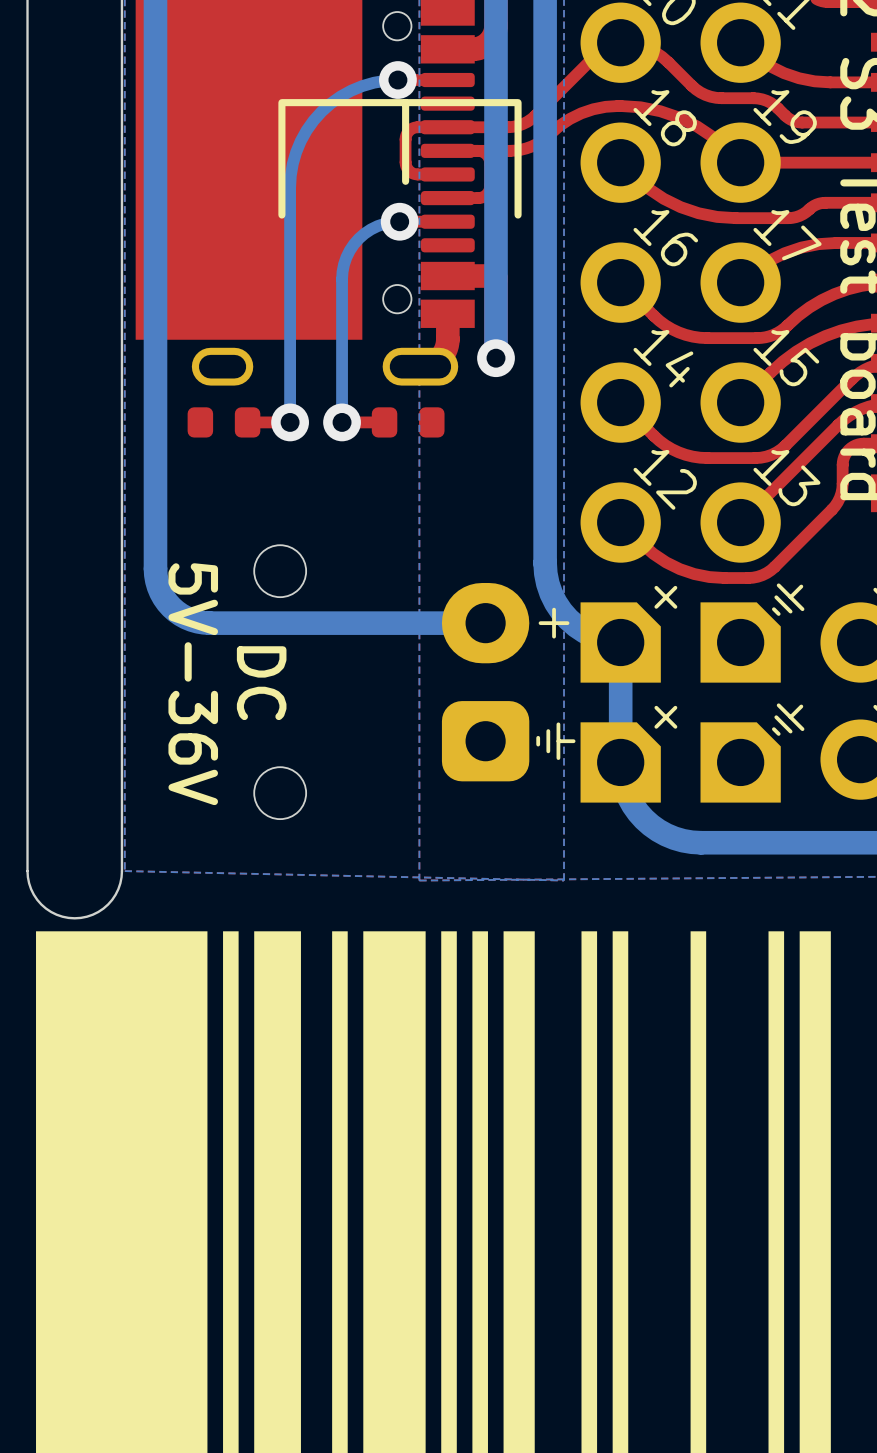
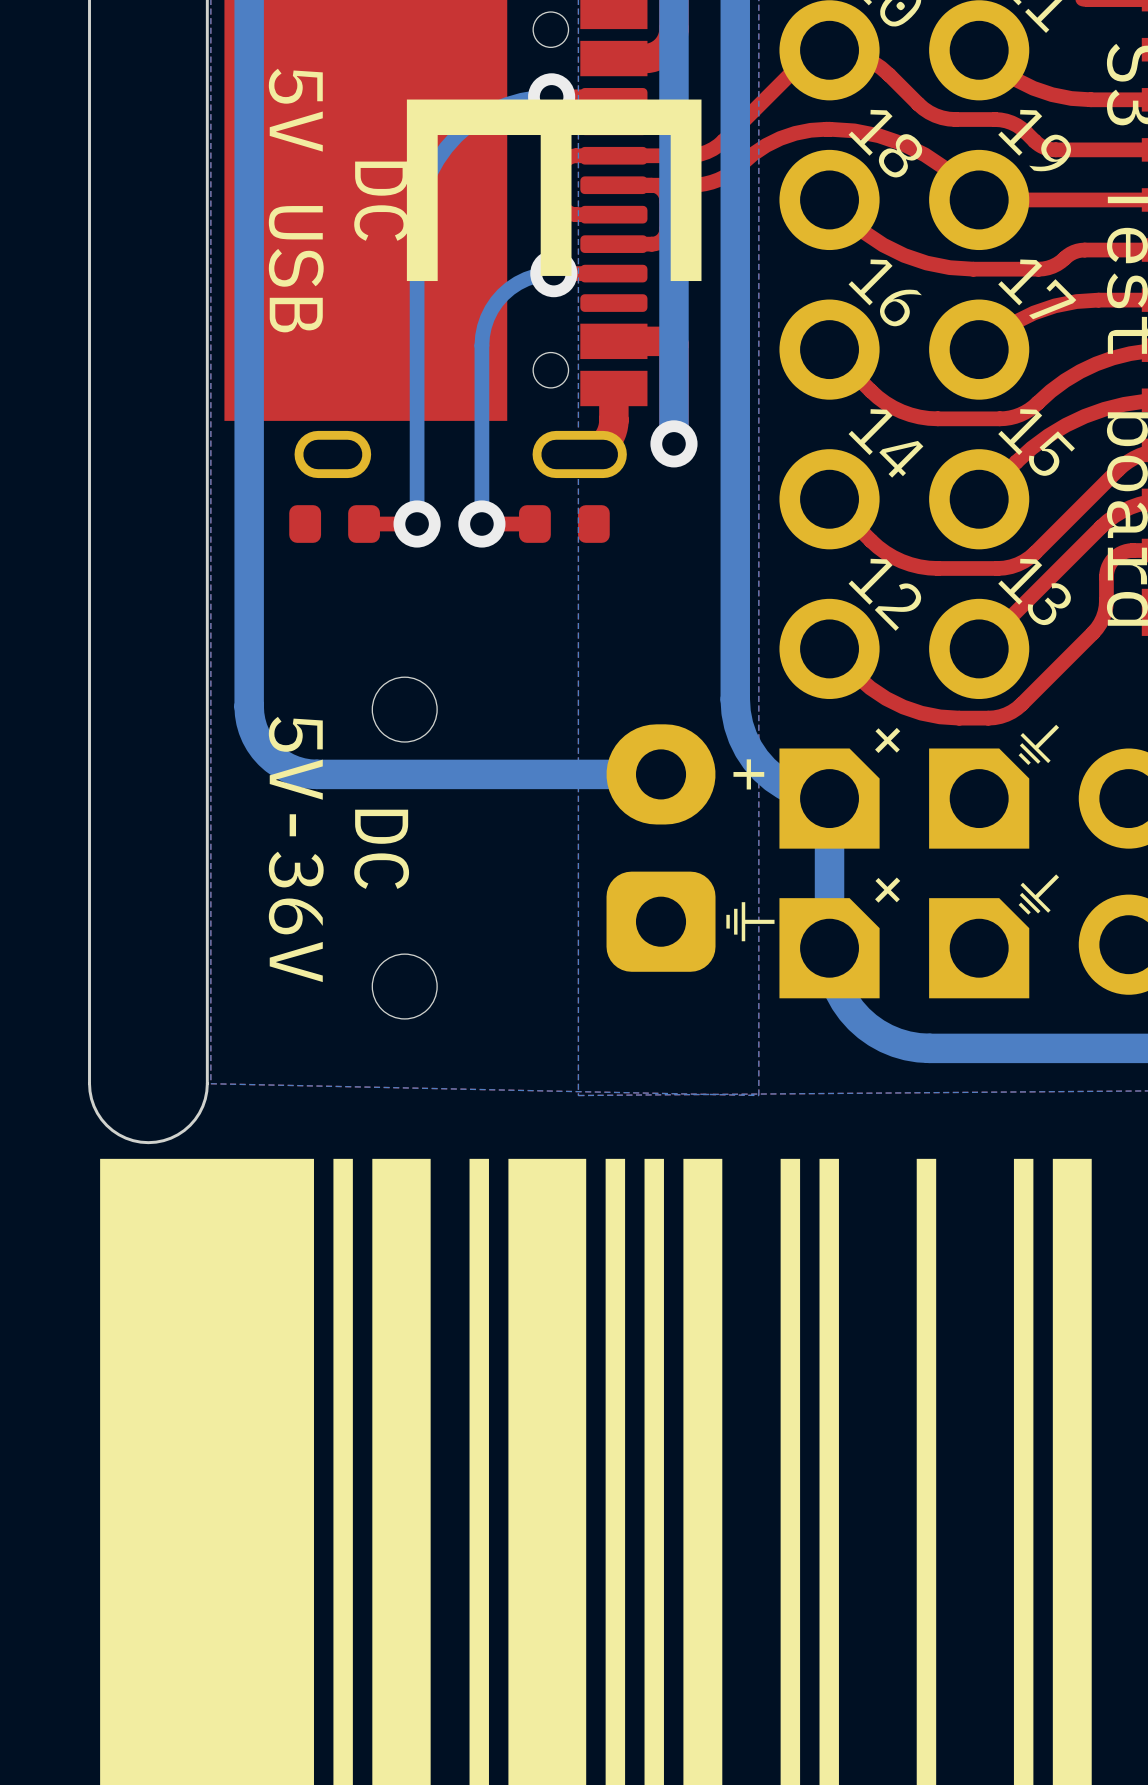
text: none -> 5V USB (296, 200)
text: none -> DC (381, 201)

